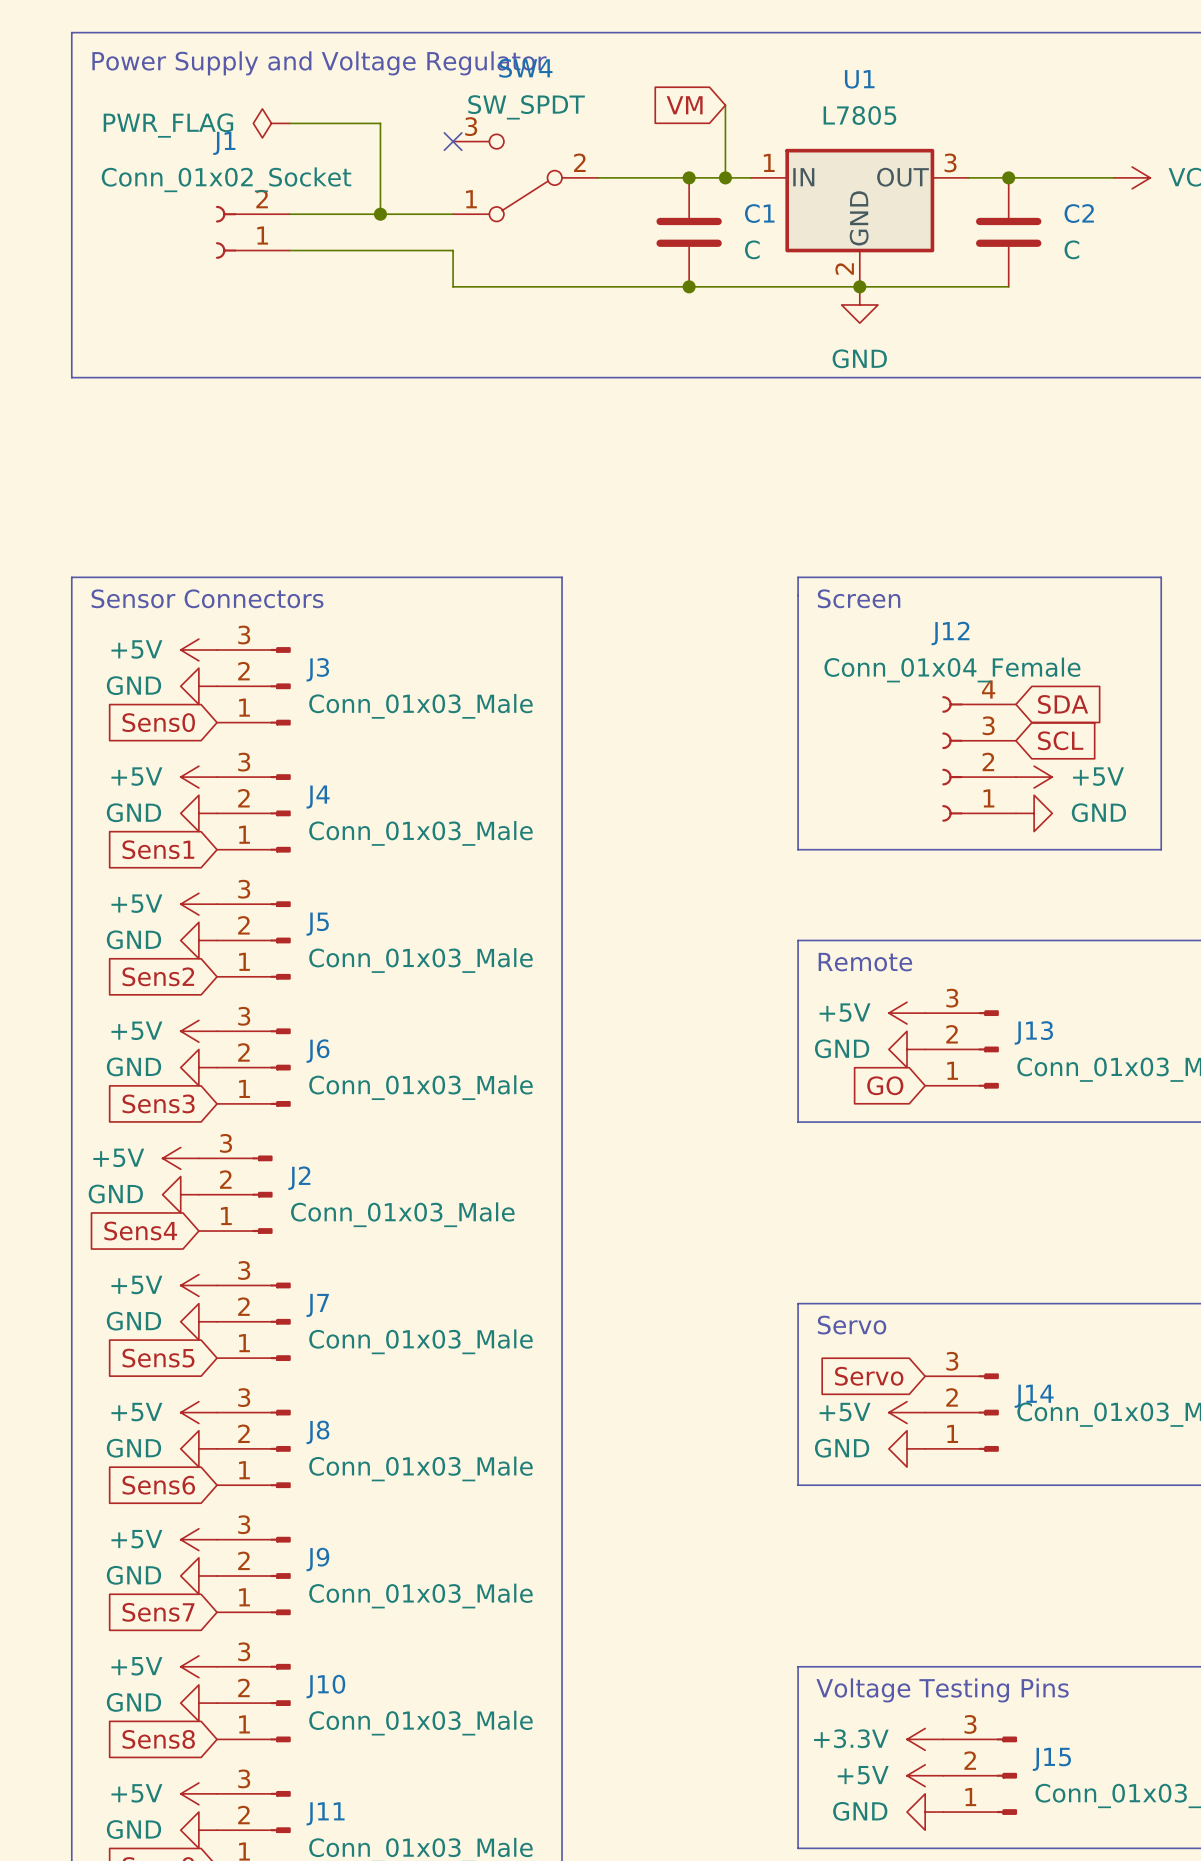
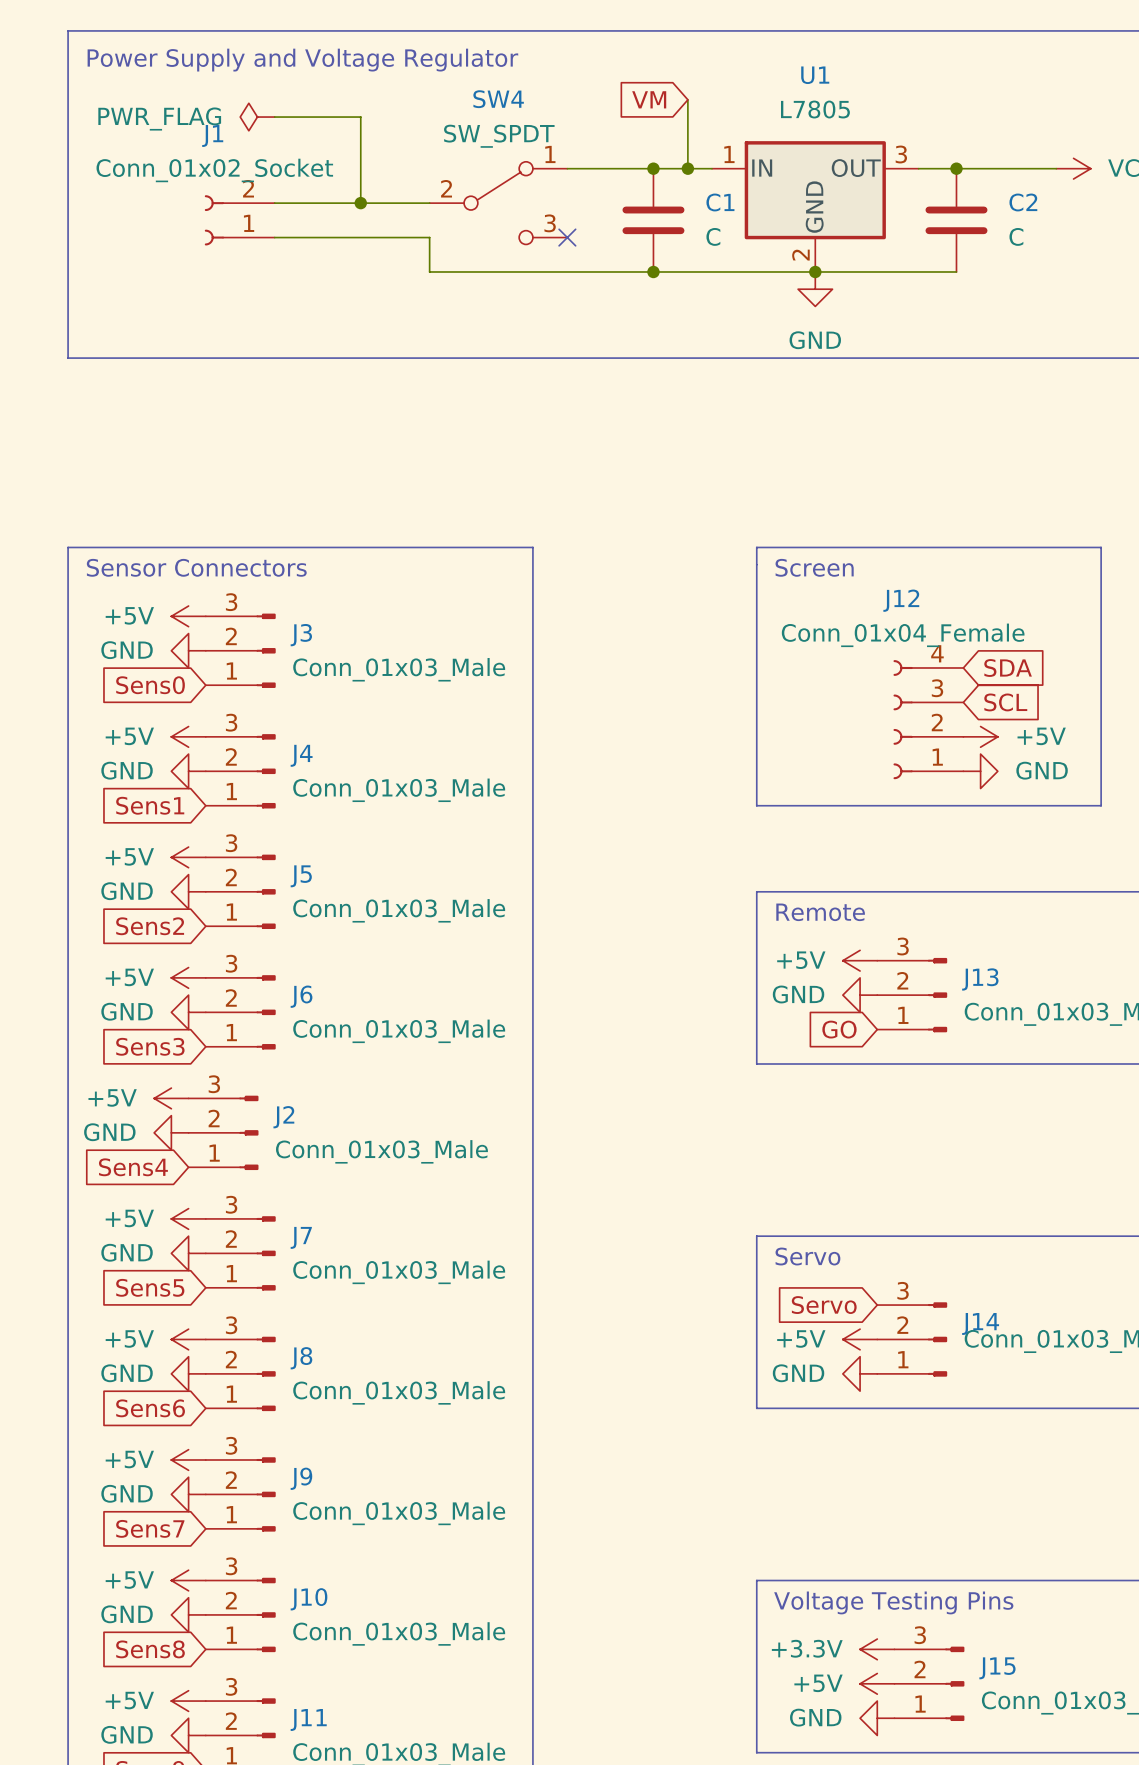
no-connect mark: (453, 141) -> none
SW4 rotation: 0° (525, 177) -> 180° (498, 203)
no-connect mark: none -> (567, 237)

